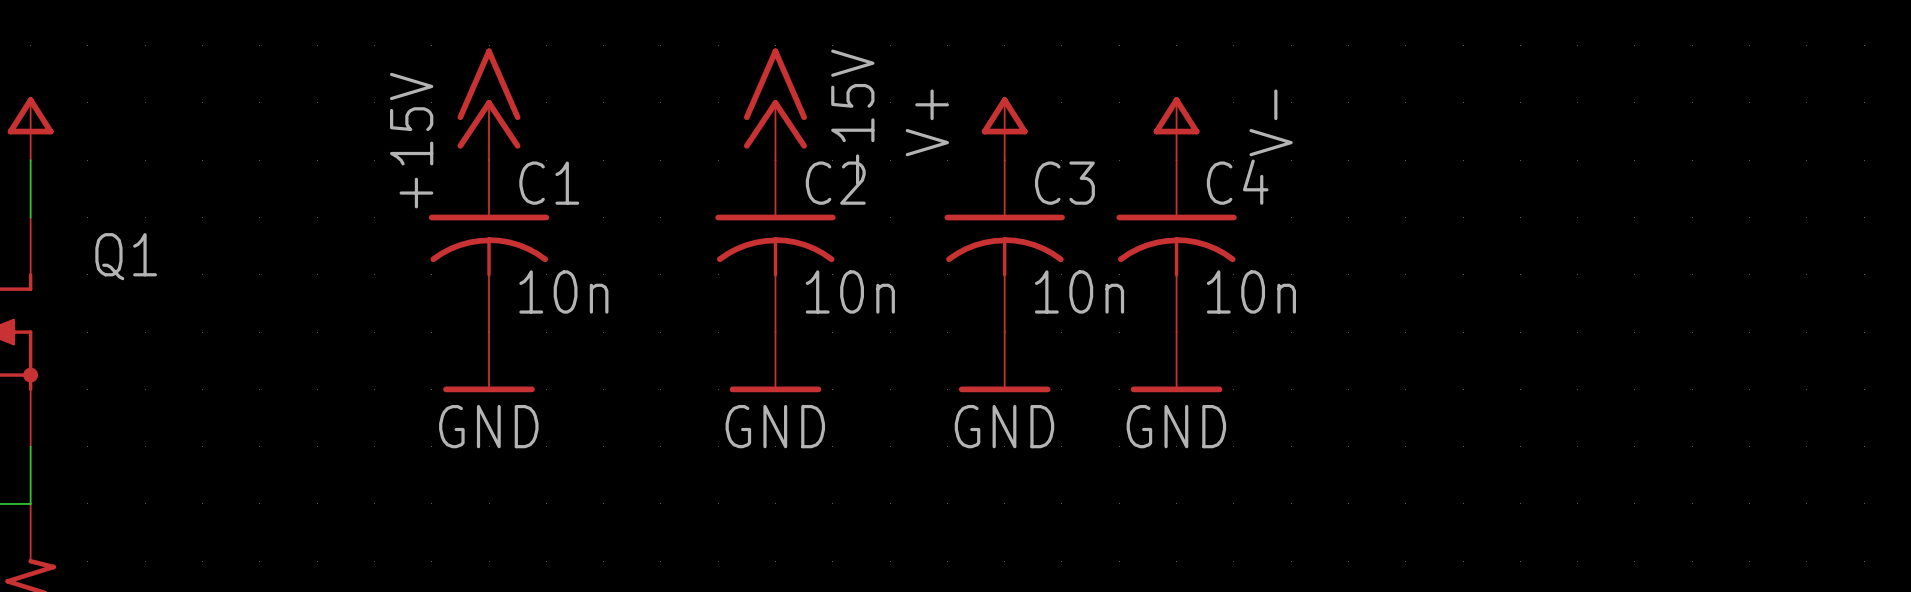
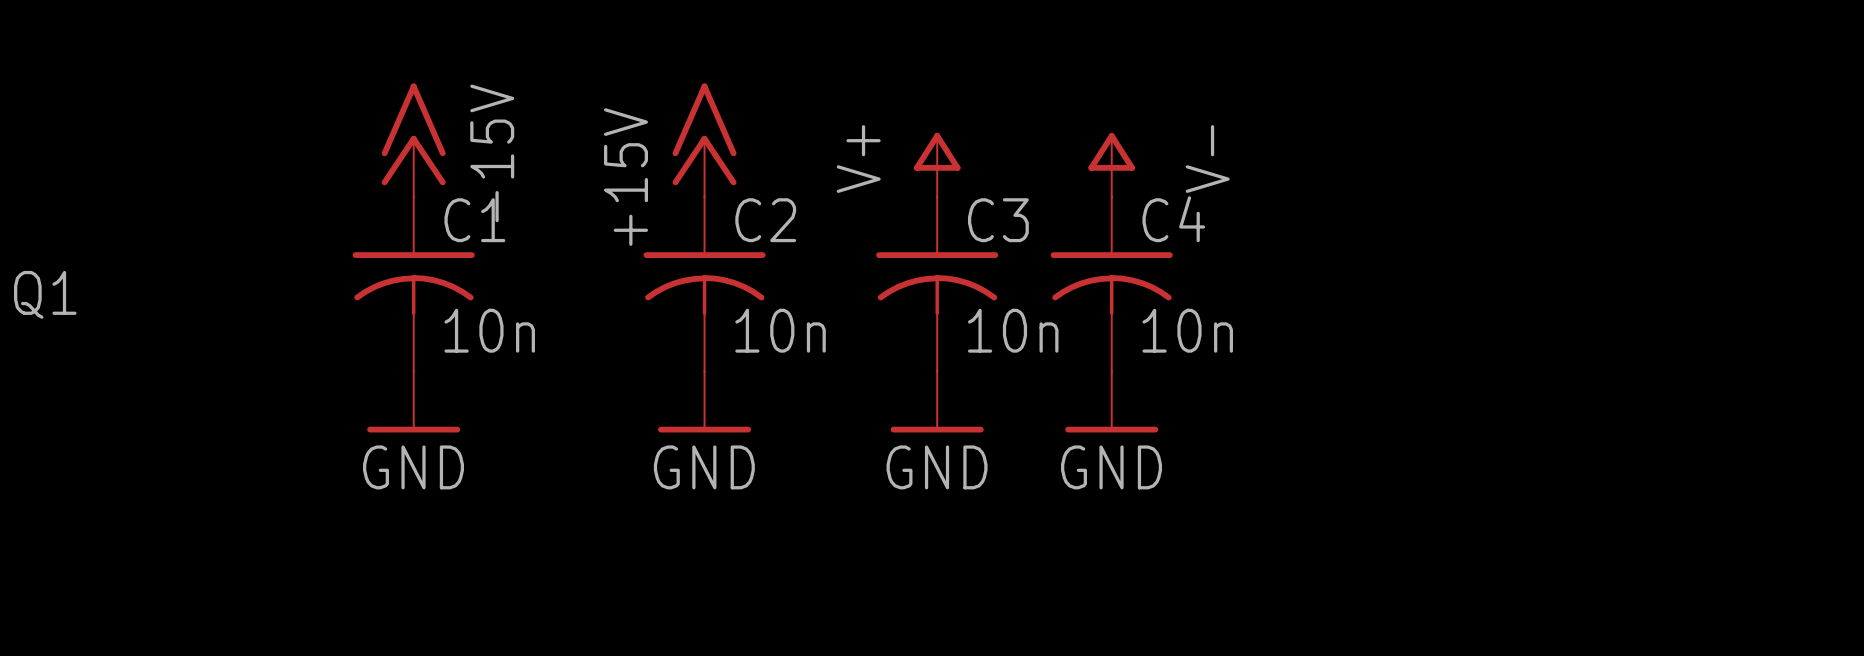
power symbol: +15V (489, 104) -> -15V (413, 140)
power symbol: -15V (775, 104) -> +15V (704, 140)

